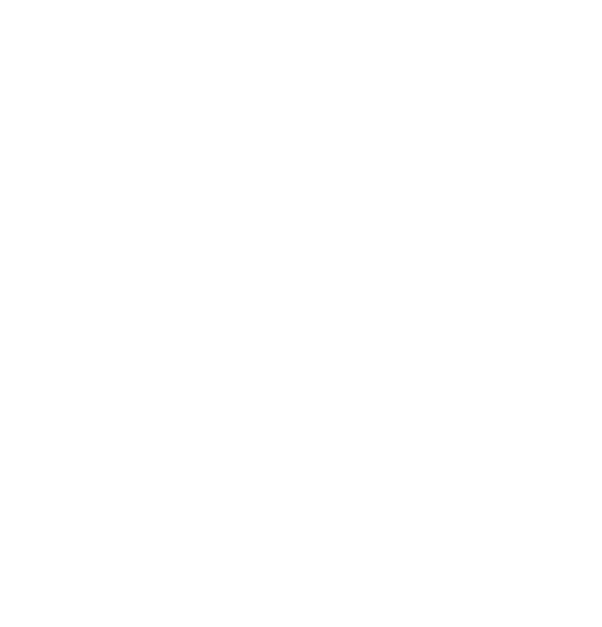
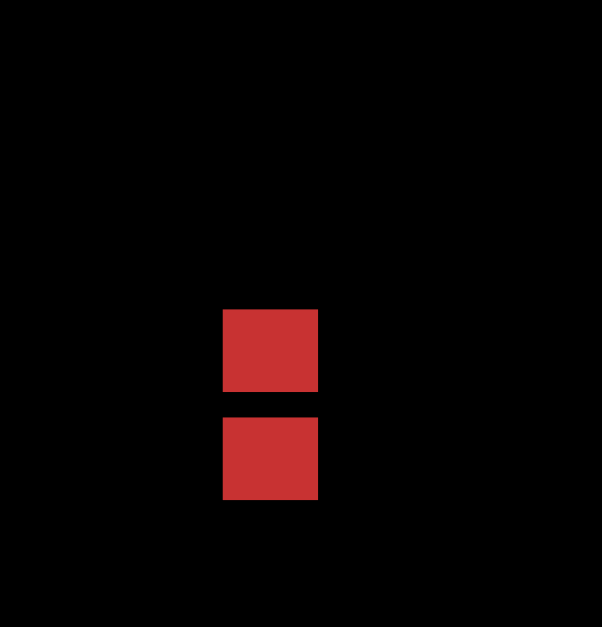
part: none -> (270, 404)

